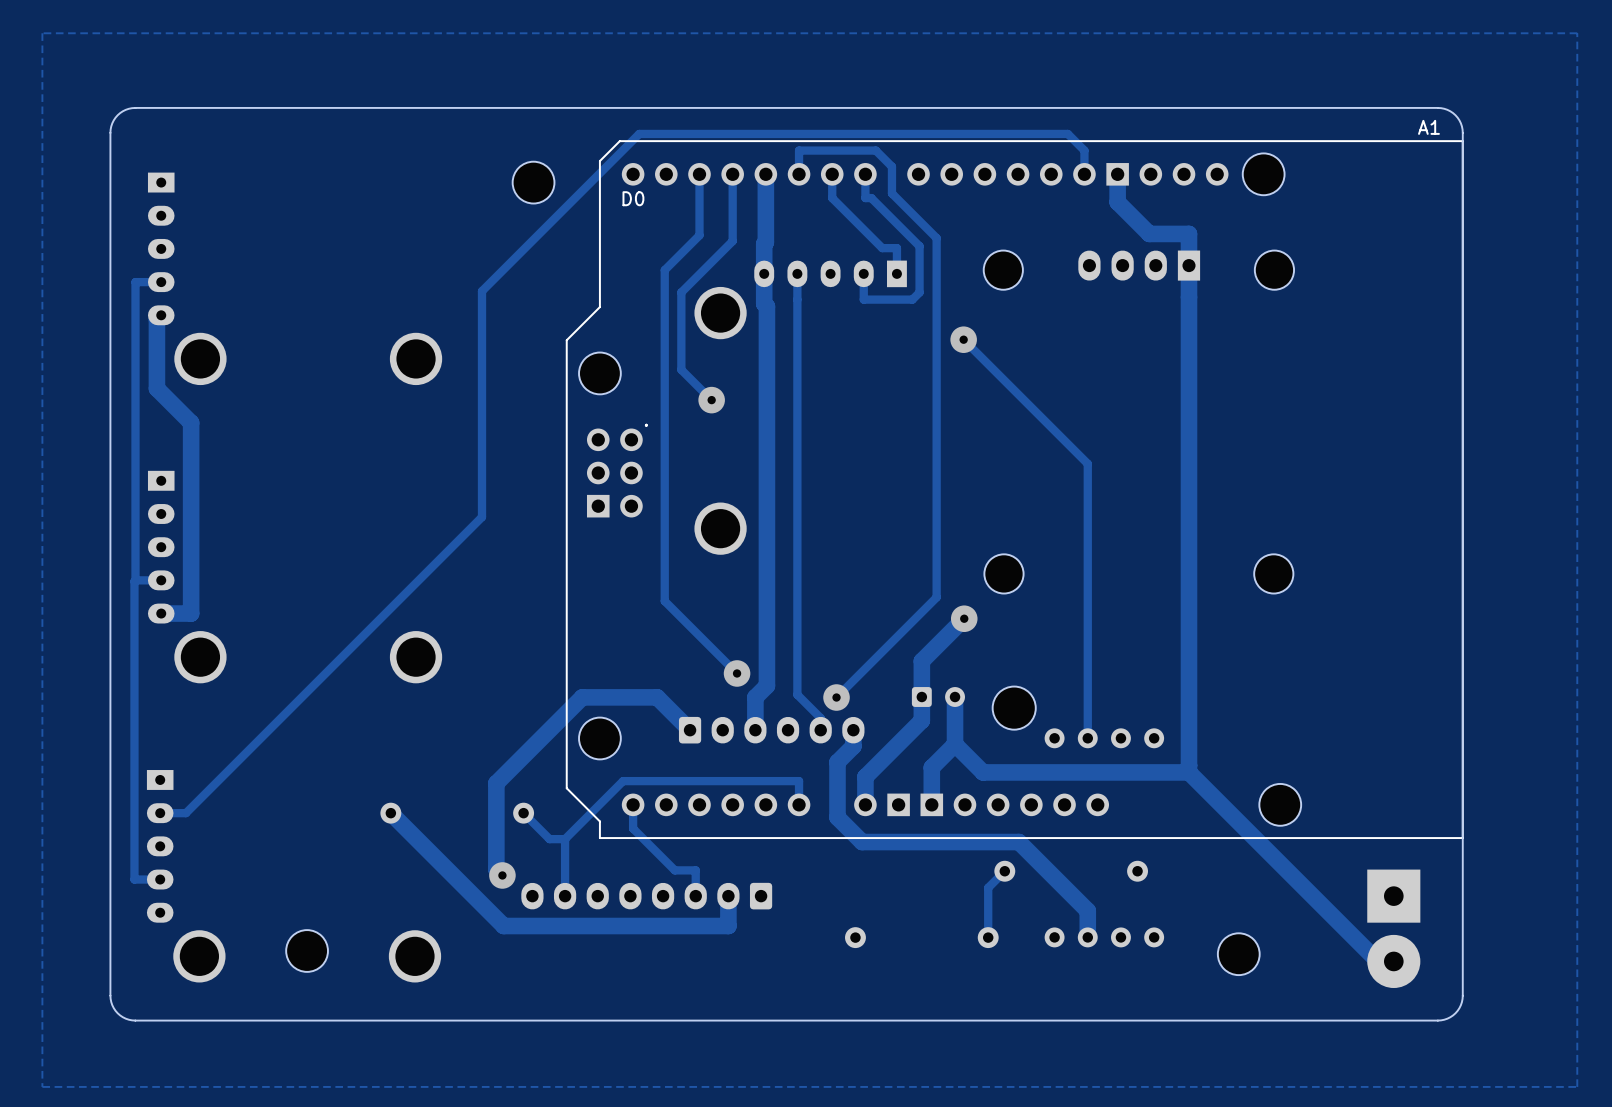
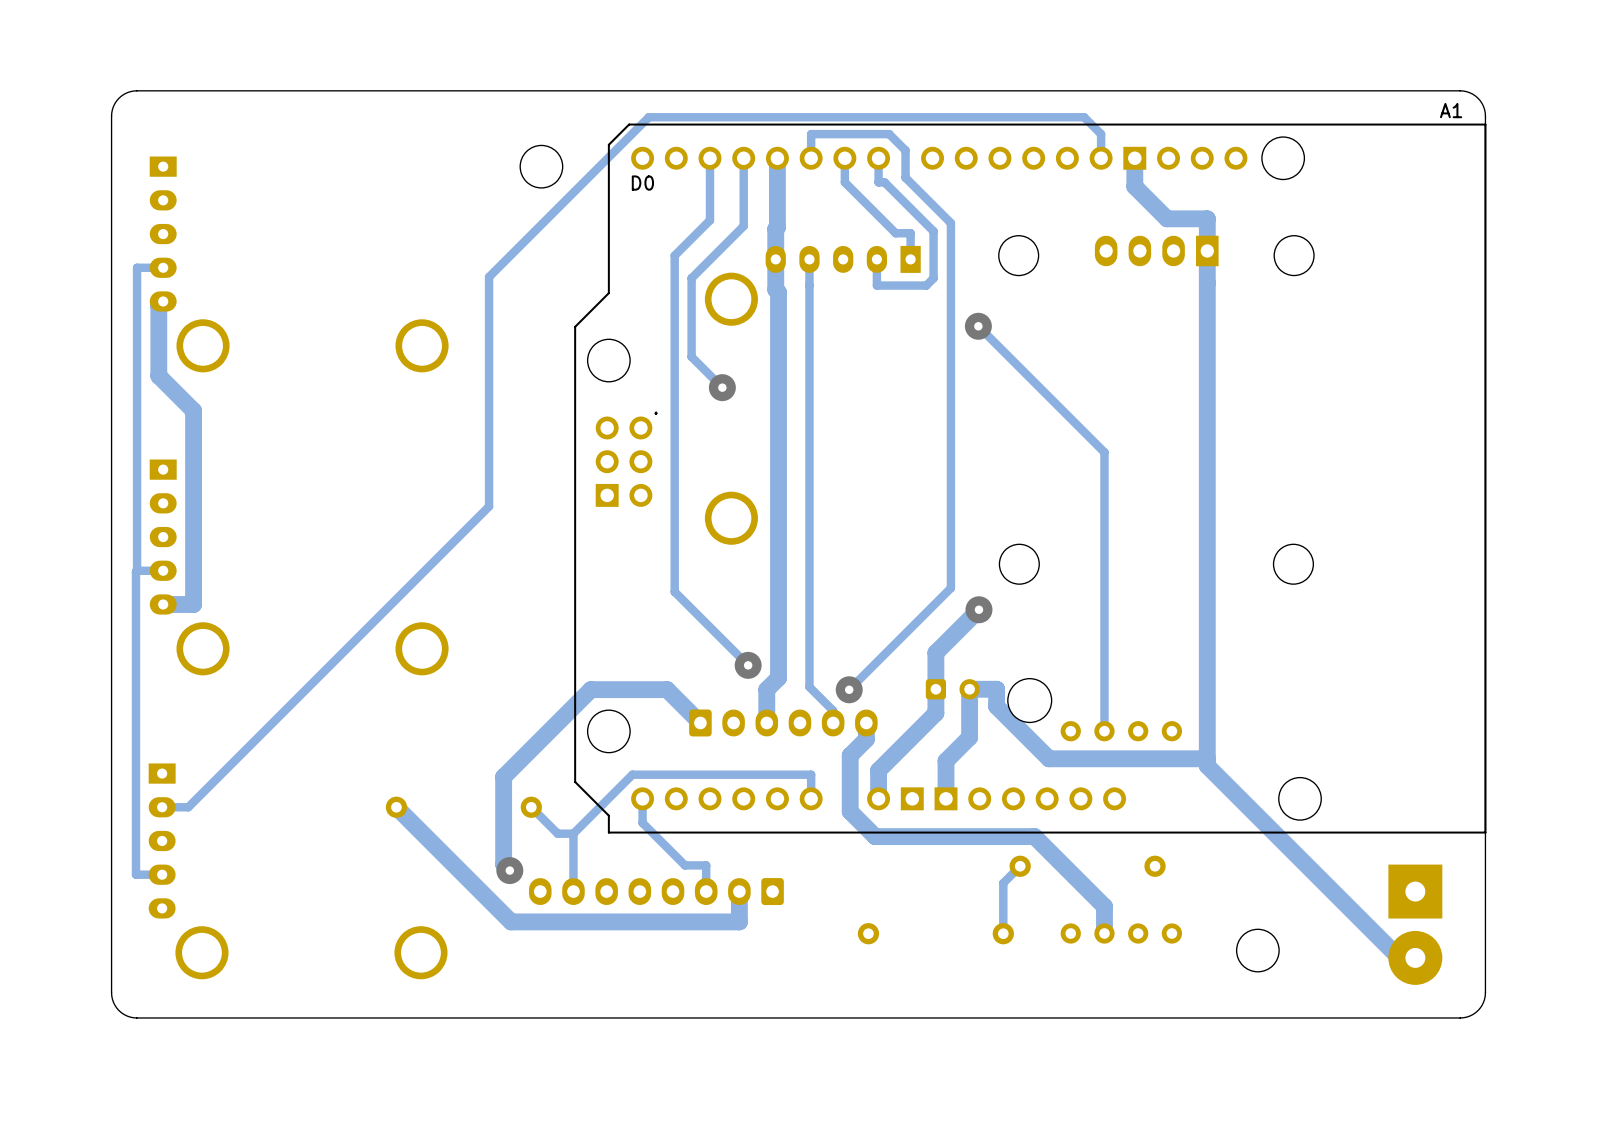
zone outline: (1577, 33) (42, 33) (42, 1086) (1577, 1086) (1577, 33) -> none
track: none -> (969, 689) (996, 689) (996, 706) (1049, 758) (1207, 758)
track: (955, 744) (983, 772) (1188, 772) -> none
part: (307, 950) -> none

